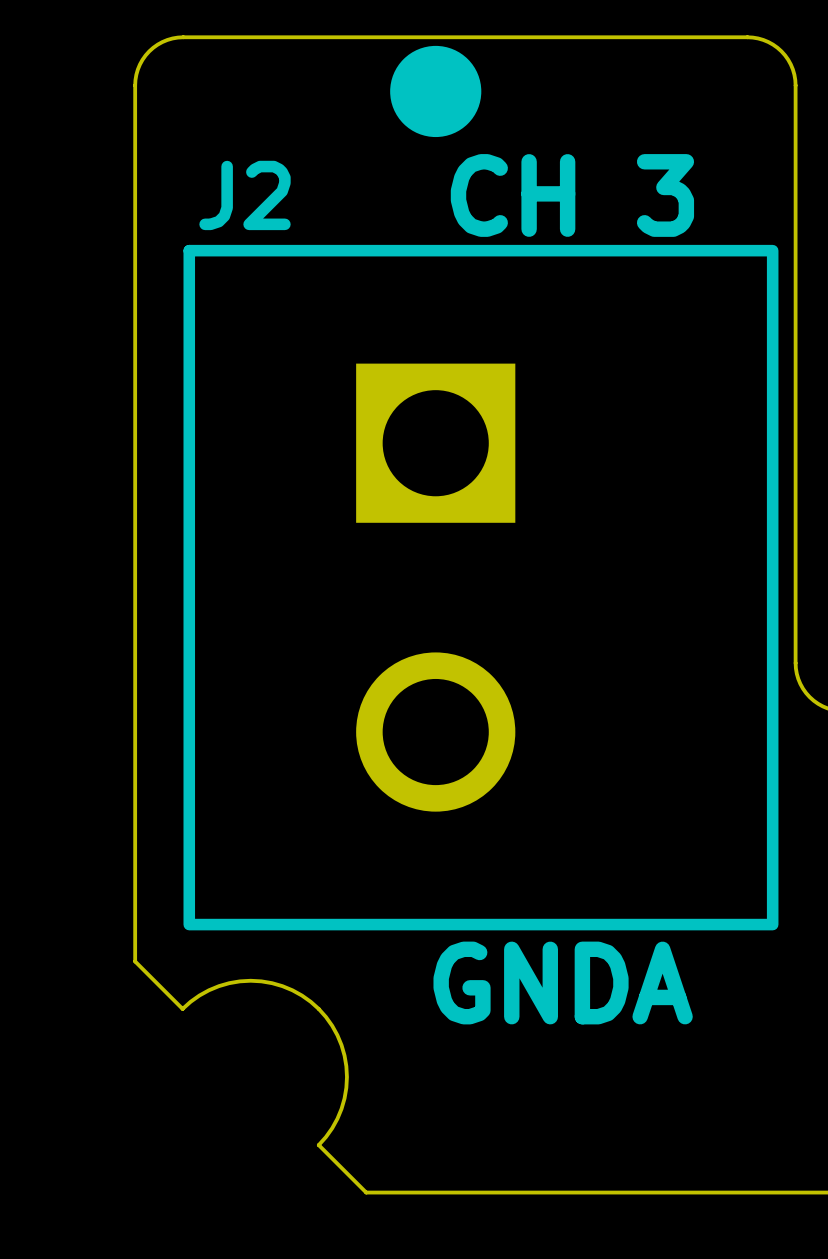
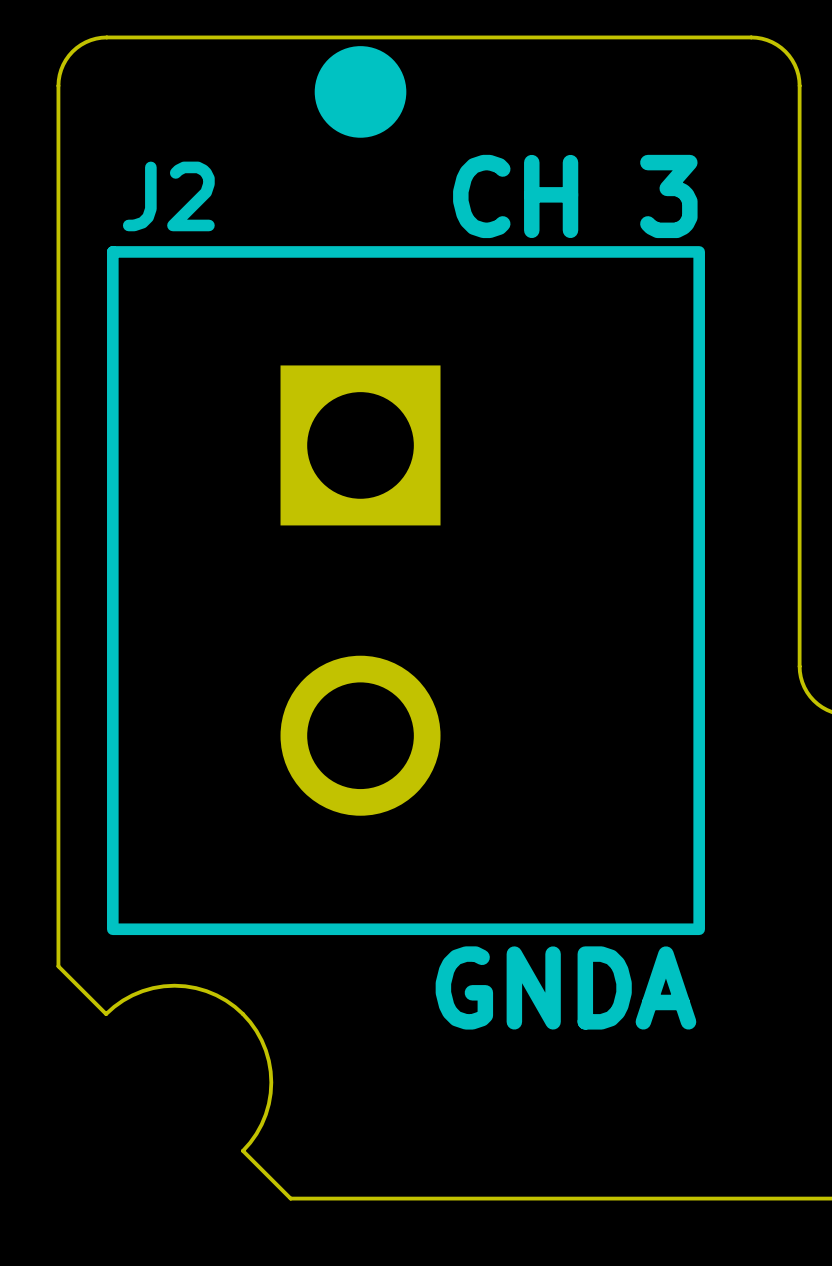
board edge: (183, 37) (167, 39) (149, 51) (137, 69) (135, 85) (135, 961) (182, 1008) (199, 995) (218, 986) (250, 980) (272, 983) (292, 990) (318, 1008) (332, 1025) (341, 1045) (346, 1077) (344, 1098) (337, 1118) (318, 1145) (366, 1192) -> (184, 37) (106, 37) (90, 40) (76, 48) (68, 55) (61, 69) (58, 80) (58, 966) (106, 1014) (132, 995) (153, 988) (174, 985) (206, 991) (234, 1006) (250, 1022) (261, 1040) (268, 1060) (271, 1082) (265, 1114) (256, 1133) (242, 1150) (290, 1198) (368, 1198)
J2 position: (480, 488) -> (405, 490)

